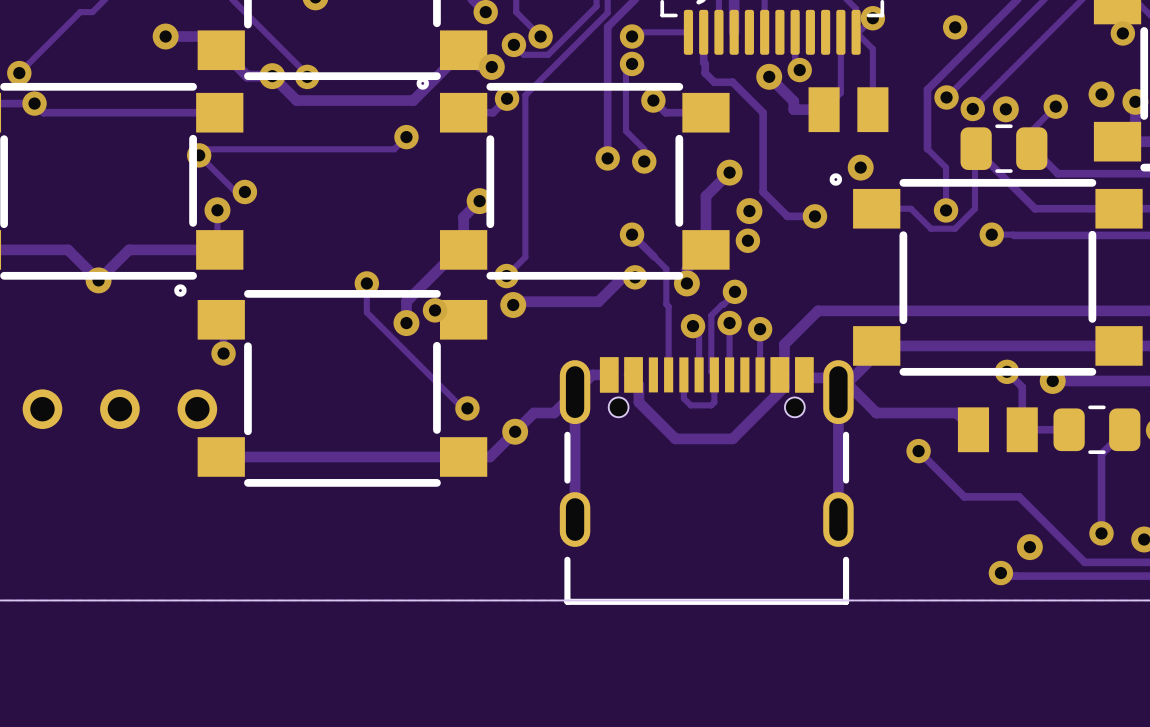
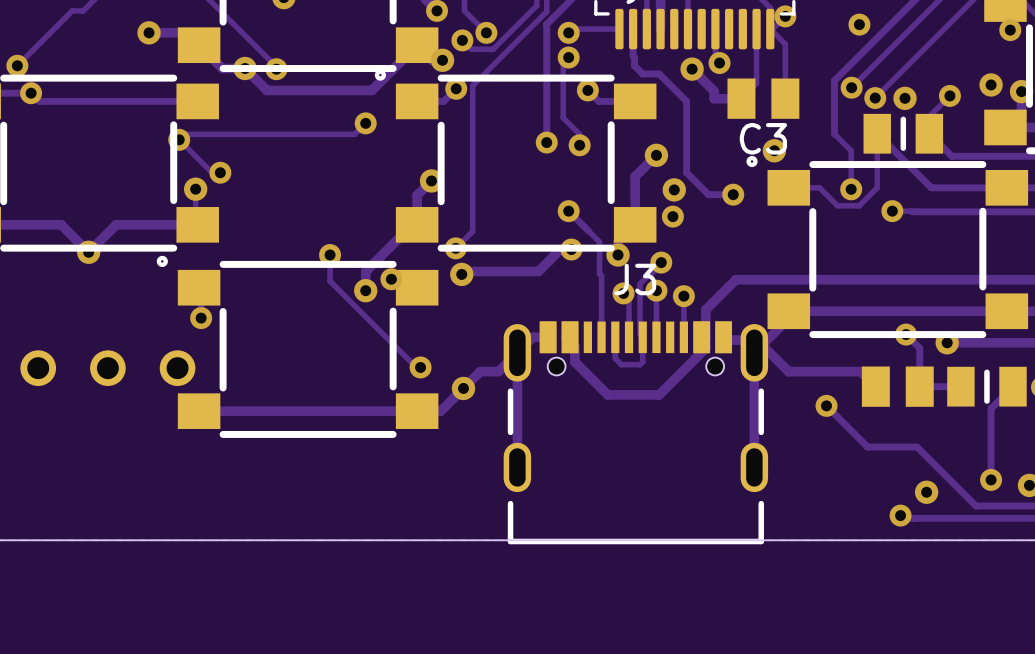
part footprint: [960, 124, 1048, 173] -> [863, 113, 944, 154]
C3 name: none -> C3 (763, 138)
J3 name: none -> J3 (635, 279)
part footprint: [1053, 405, 1141, 454] -> [947, 366, 1027, 407]

